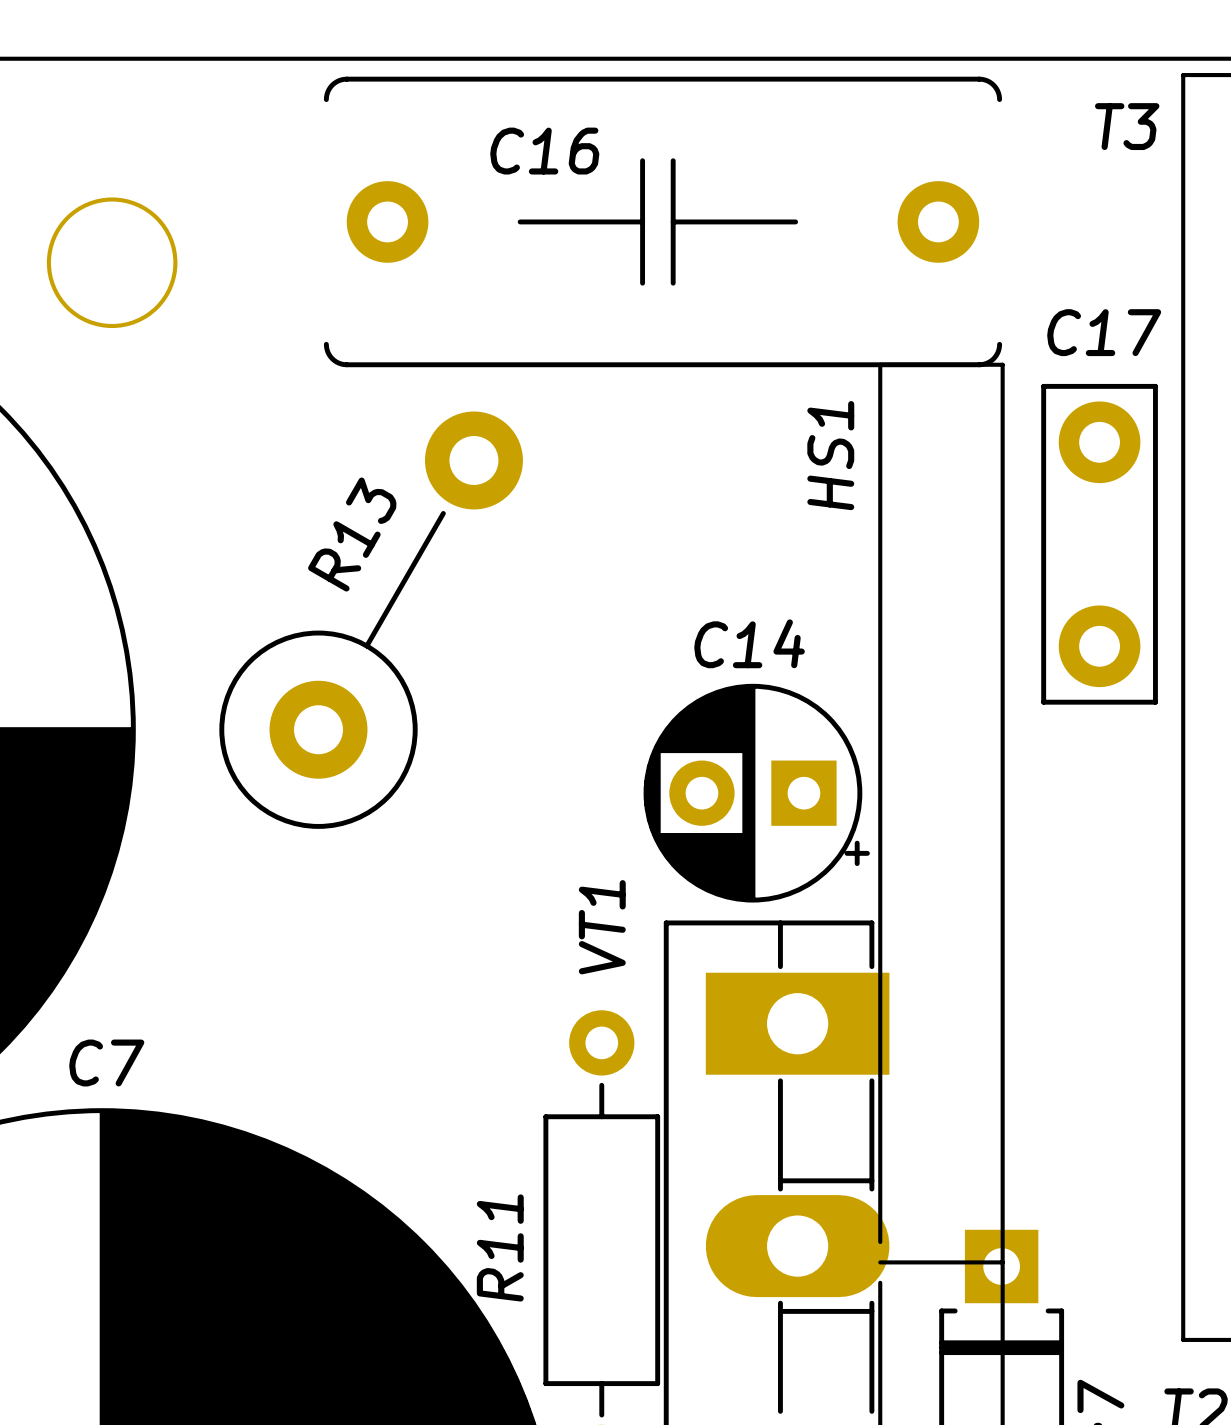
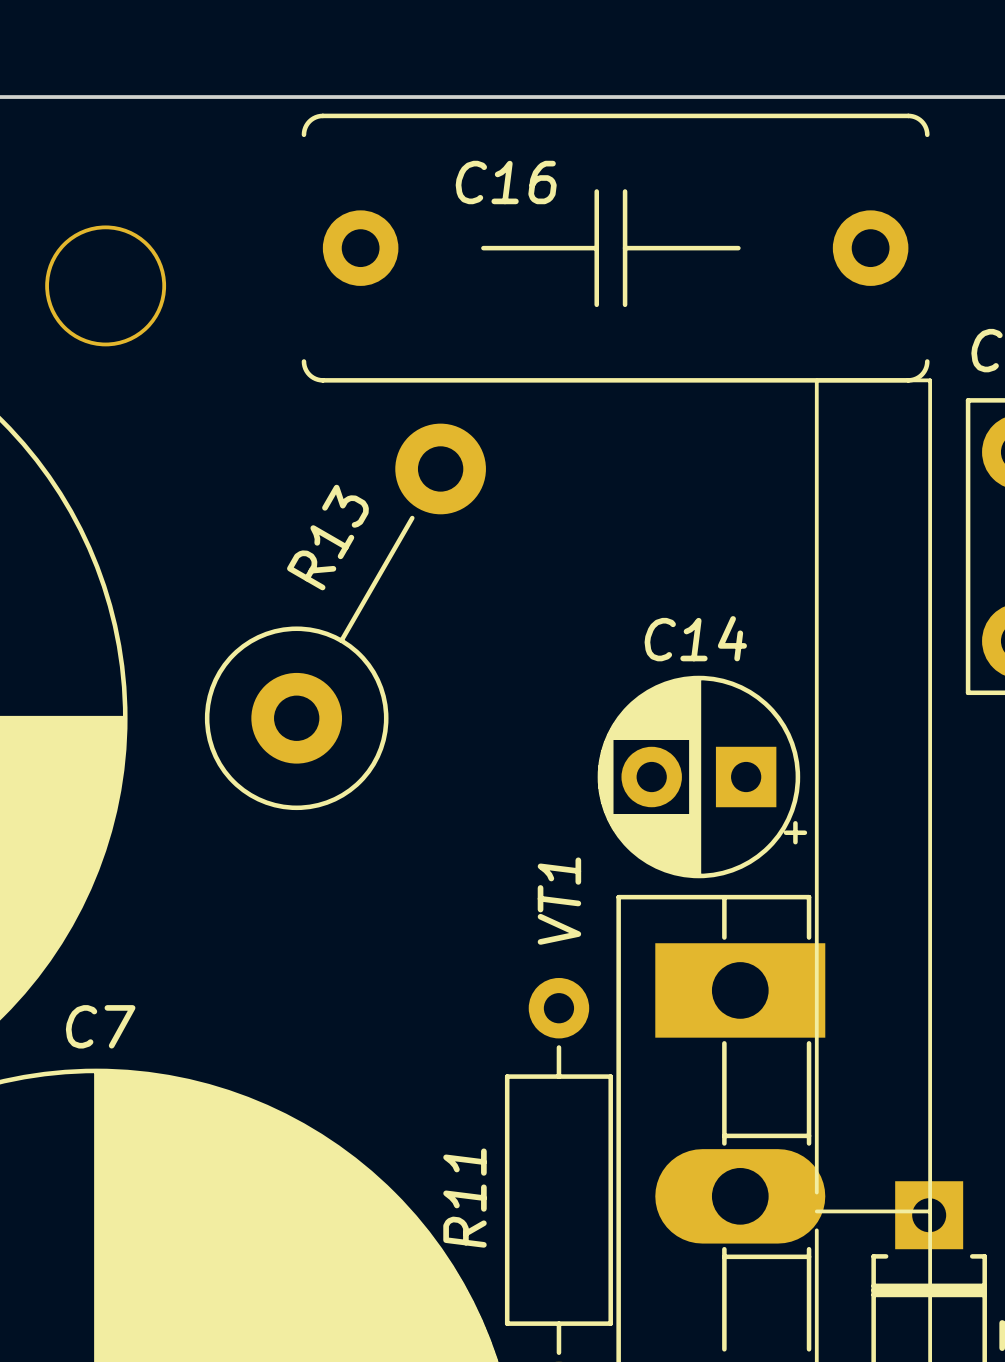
HS1 name: HS1 (830, 455) -> none

